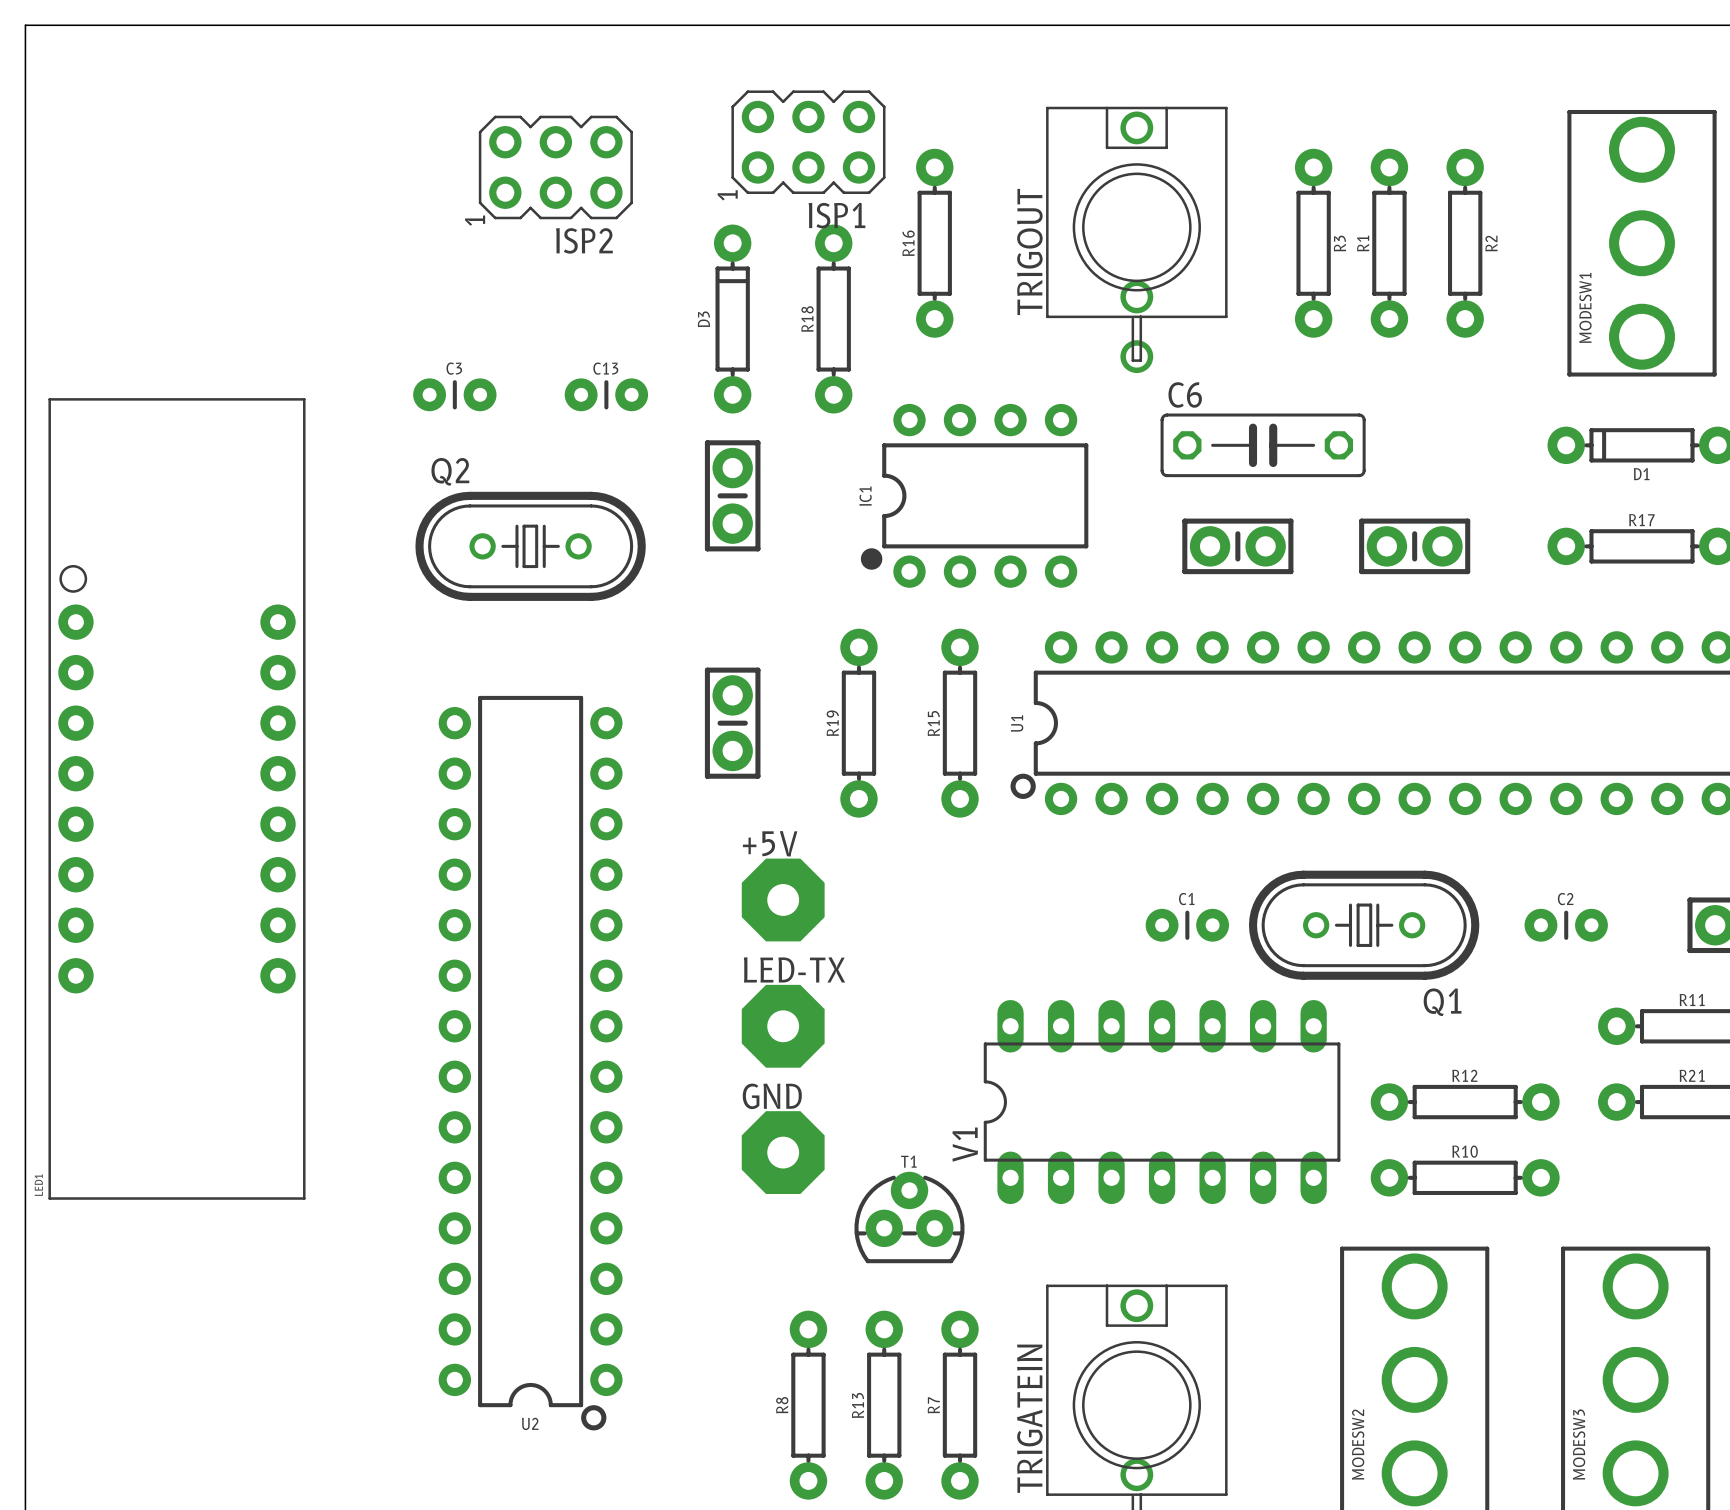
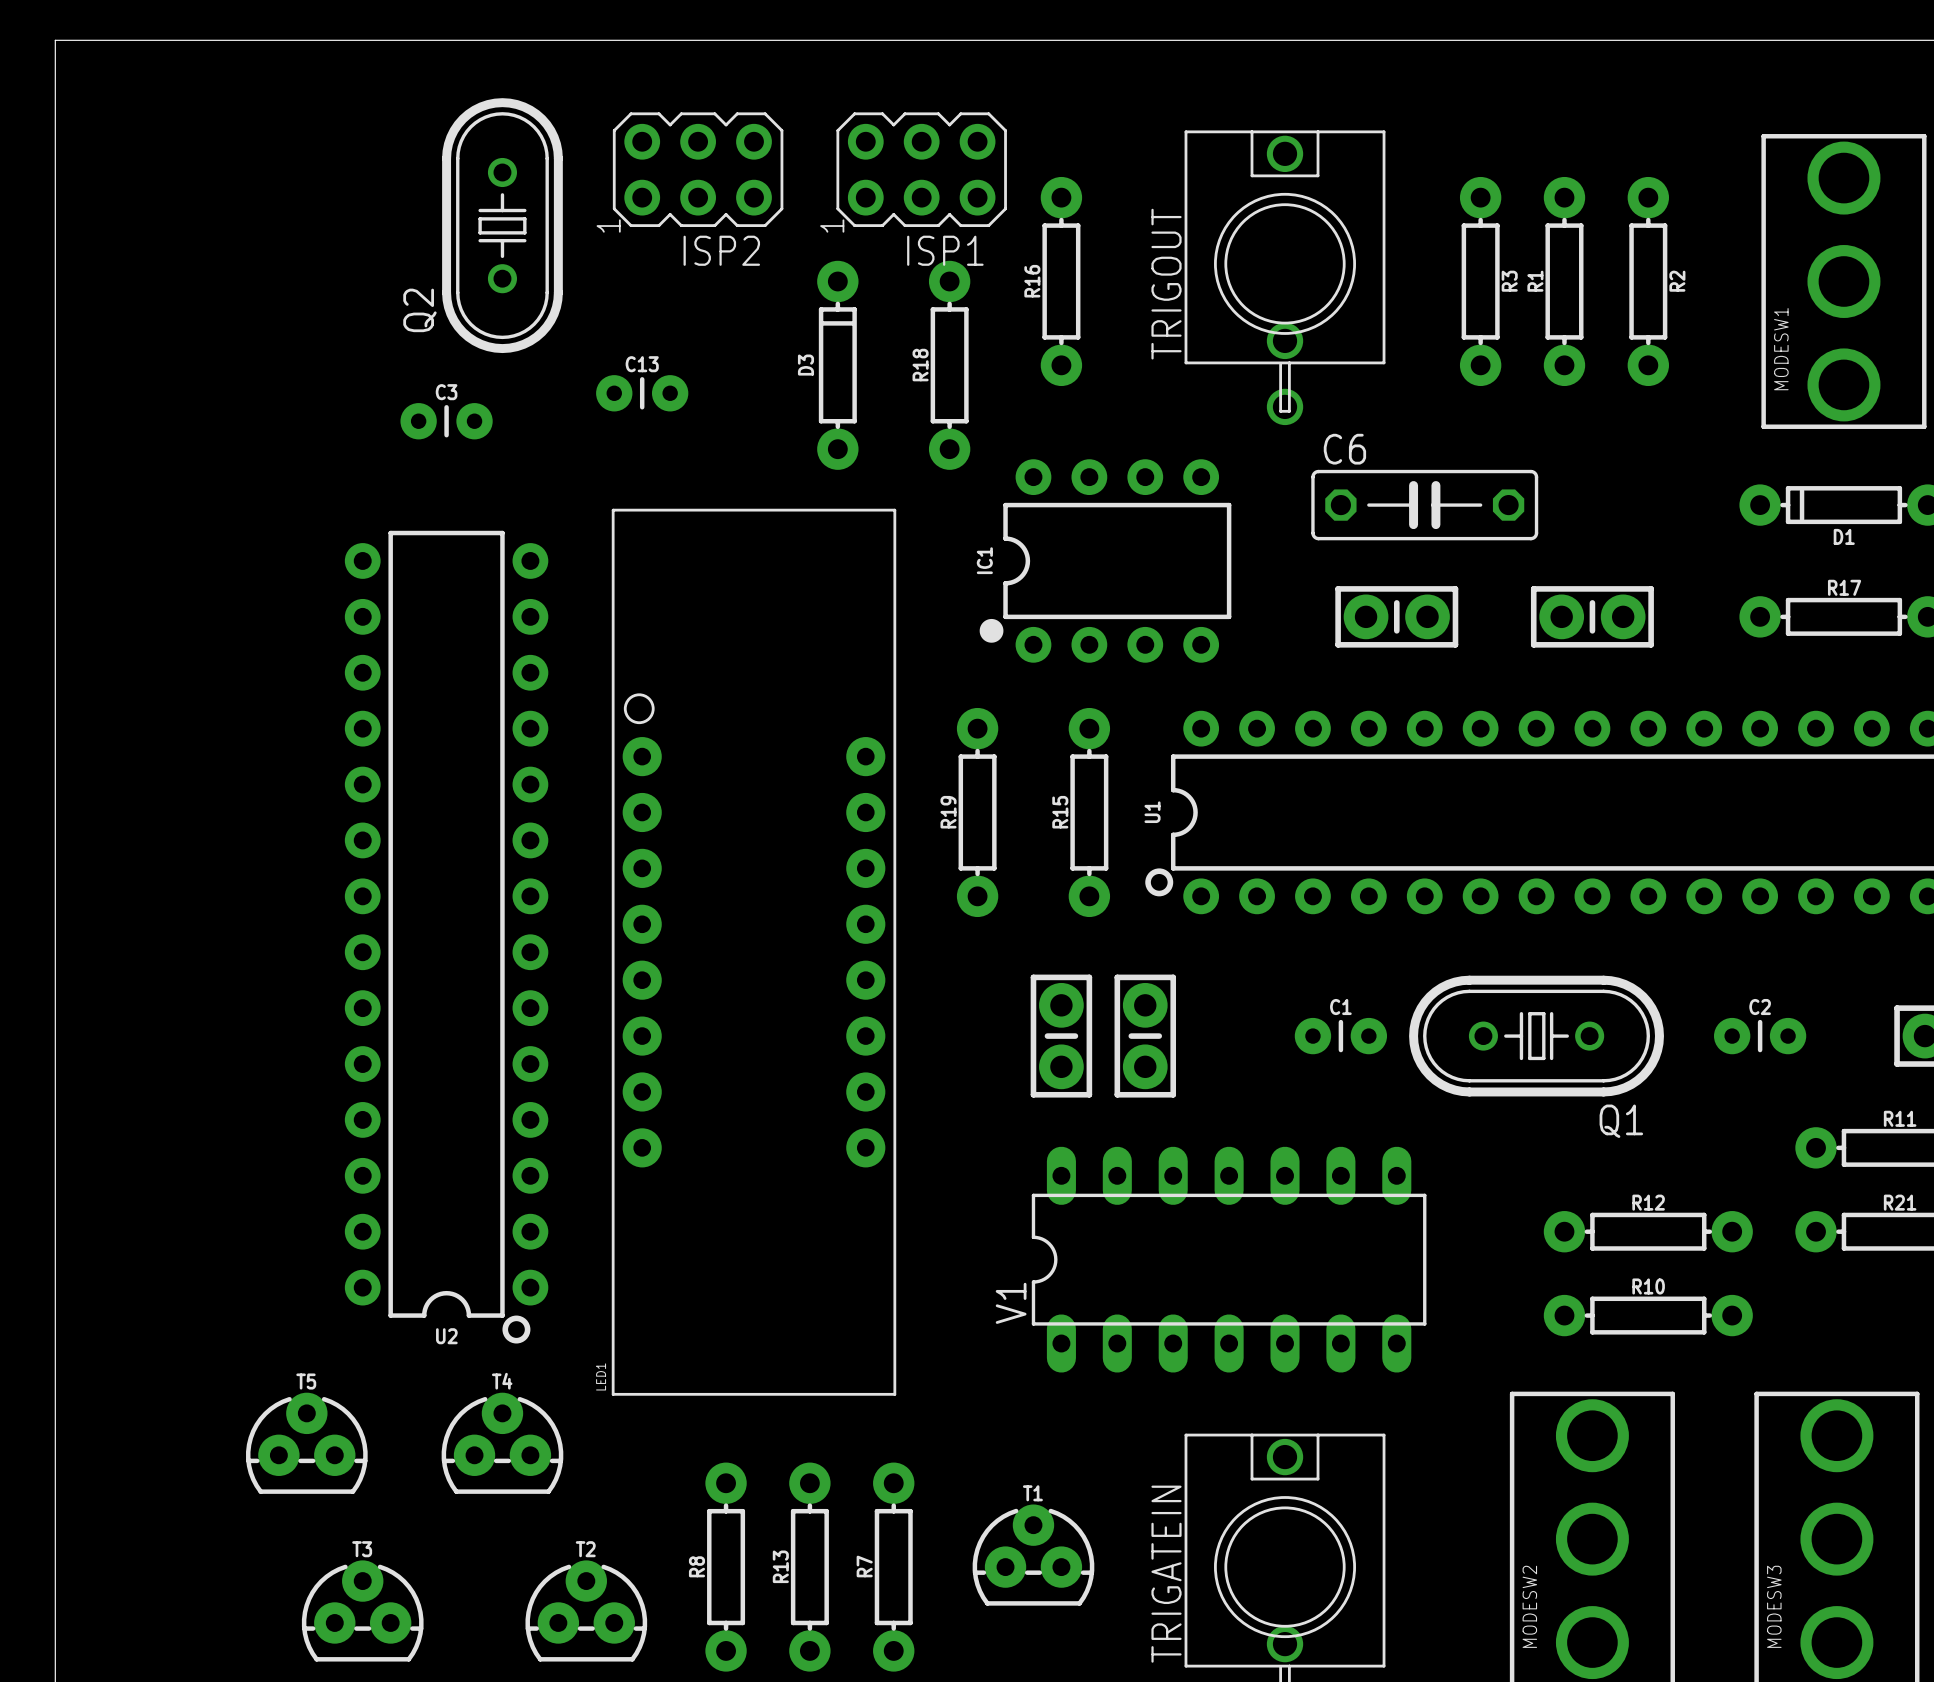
ISP2 position: (555, 167) -> (698, 169)
C3 position: (454, 394) -> (446, 421)
C13 position: (606, 394) -> (642, 393)
part: (732, 495) -> none
Q2 rotation: 0° (530, 546) -> 90° counterclockwise (502, 225)
Q2 position: (530, 546) -> (502, 225)
part: (732, 723) -> none
LED1 position: (176, 798) -> (754, 952)
+5V: (783, 899) -> none
part: none -> (1061, 1036)
part: none -> (1145, 1036)
LED-TX: (783, 1026) -> none
U2 position: (530, 1063) -> (446, 937)
V1 position: (1162, 1102) -> (1229, 1259)
GND: (783, 1152) -> none
T1 position: (909, 1217) -> (1033, 1555)
T5: none -> (306, 1443)
T4: none -> (502, 1443)
R8 position: (808, 1405) -> (726, 1567)
R13 position: (884, 1405) -> (809, 1567)
R7 position: (960, 1405) -> (893, 1567)
T3: none -> (362, 1610)
T2: none -> (586, 1610)

